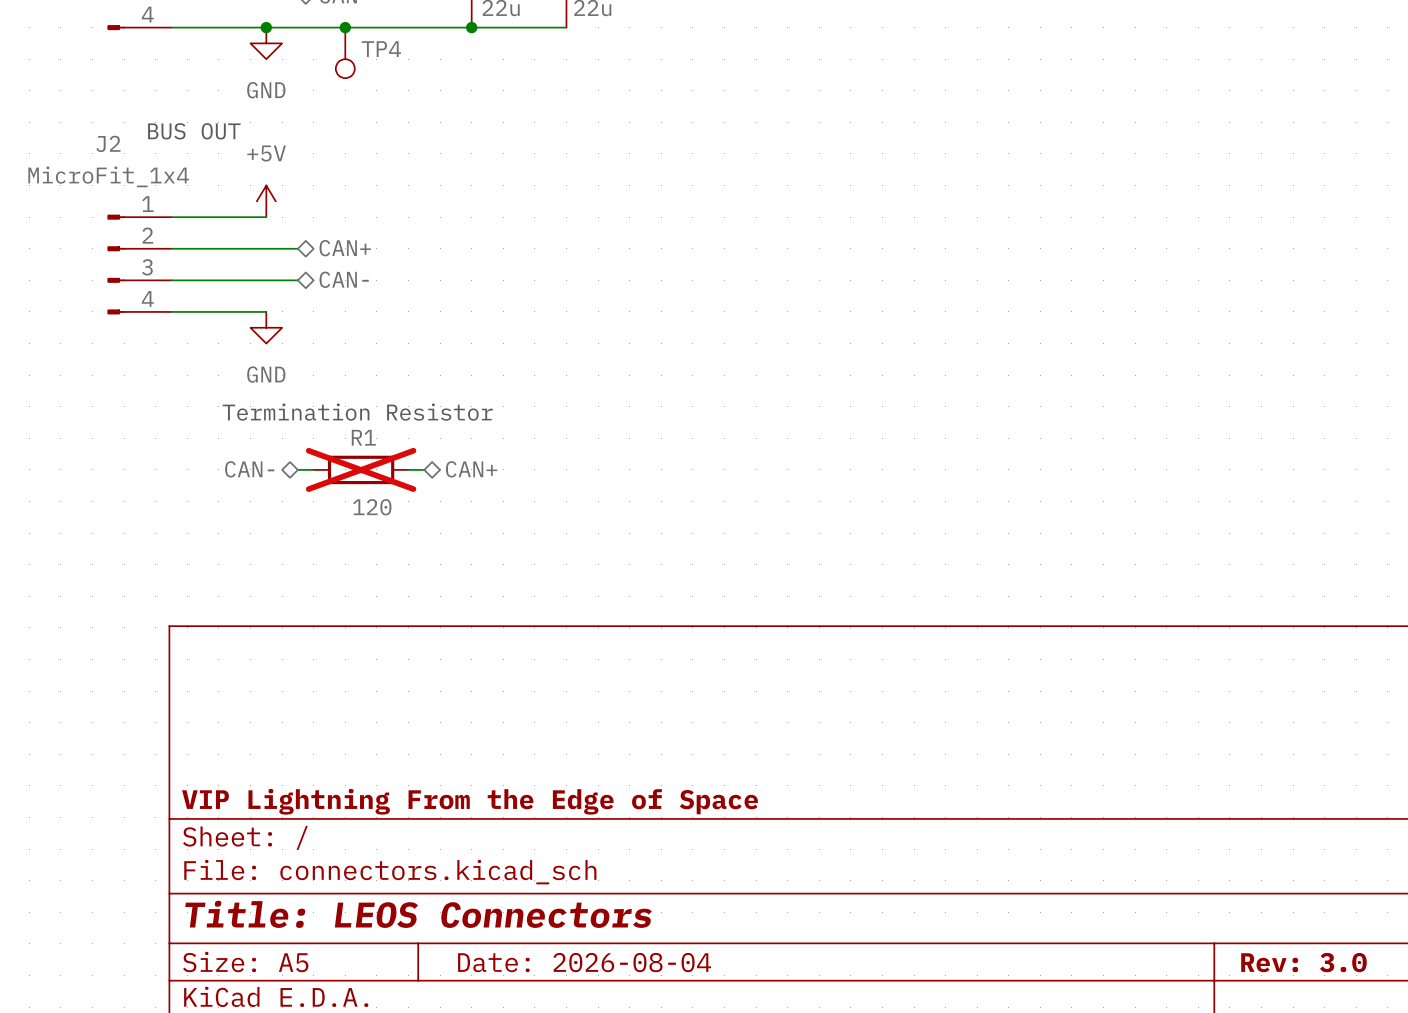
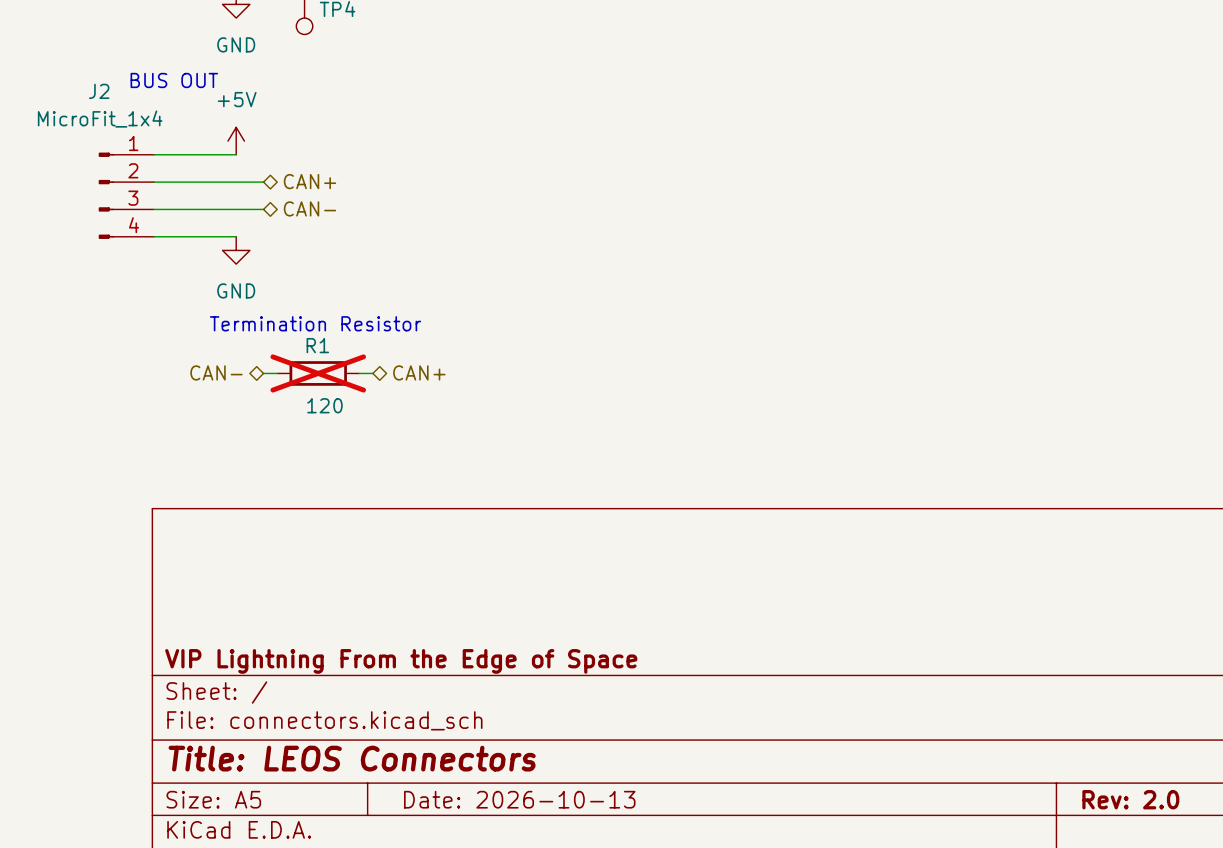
title block: Date: 2026-08-04 (584, 962) -> Date: 2026-10-13 (519, 799)
title block: Rev: 3.0 (1303, 962) -> Rev: 2.0 (1130, 799)

